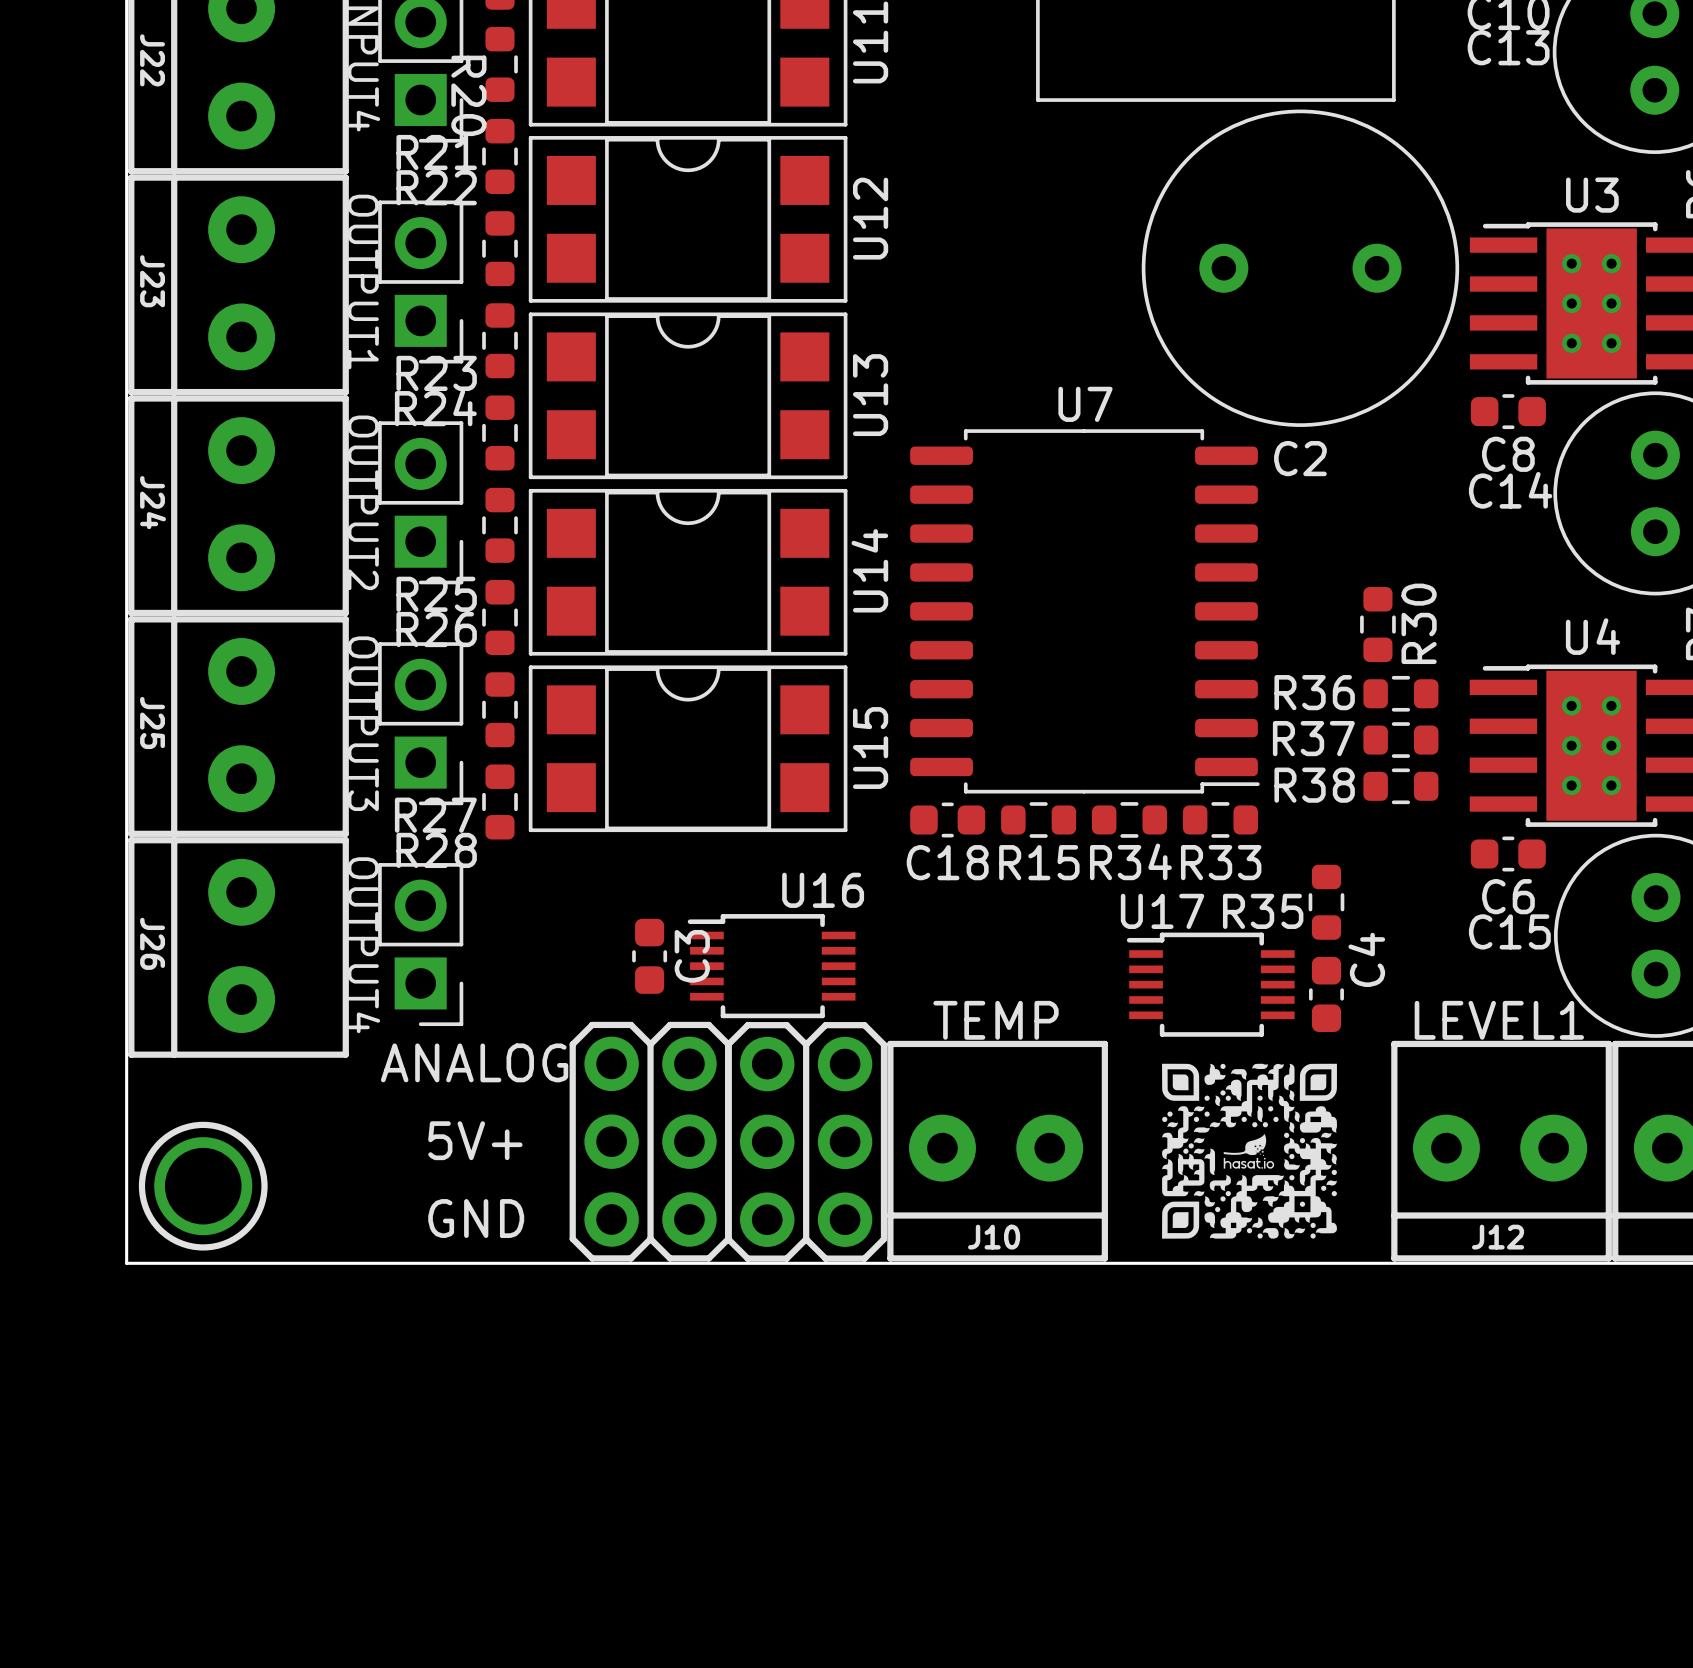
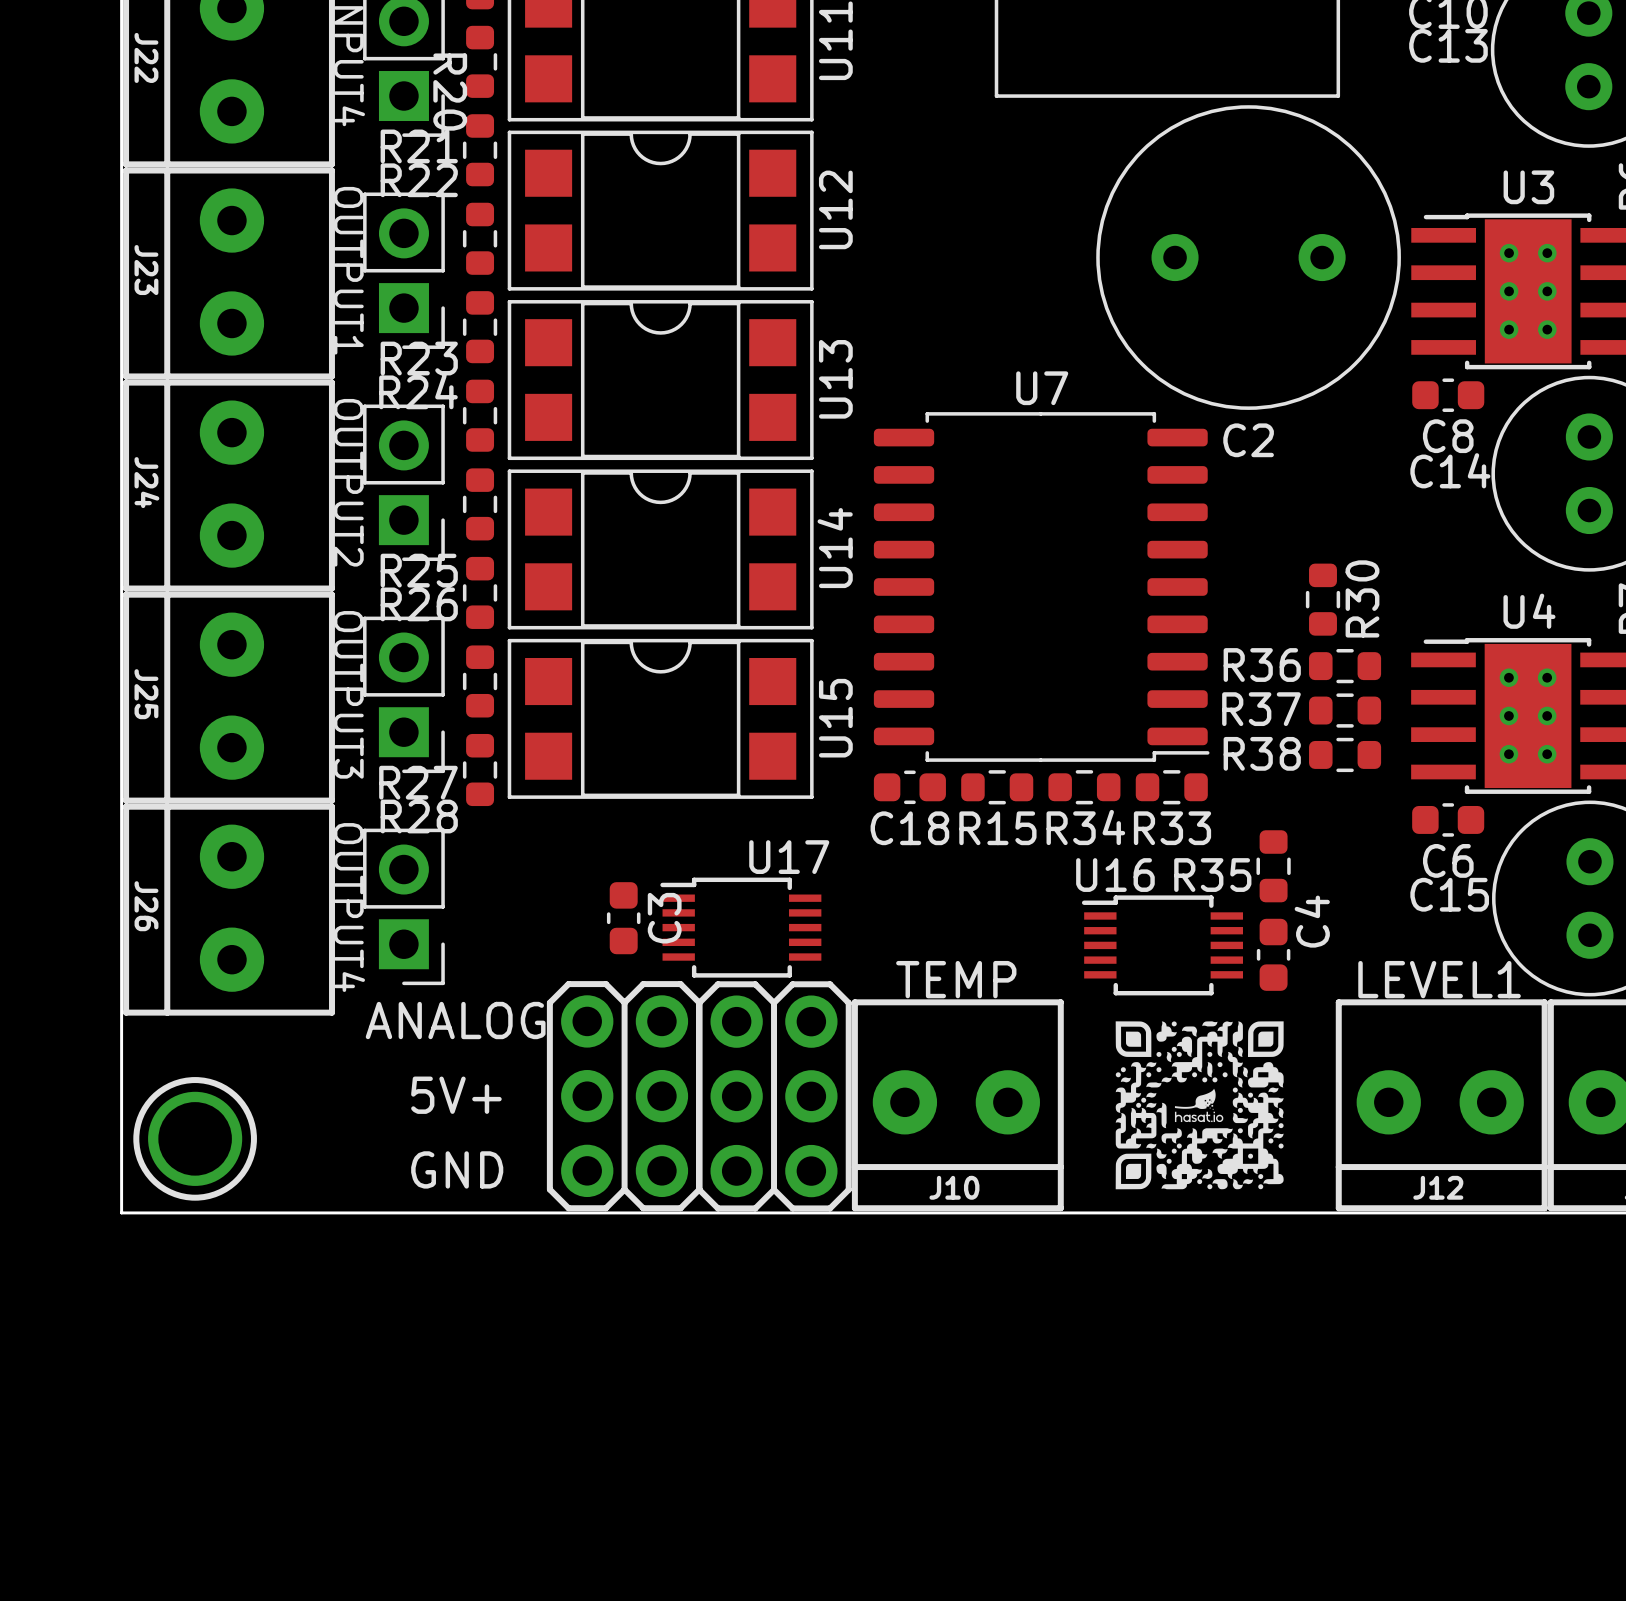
U16 name: U16 (823, 890) -> U17 (789, 857)
U17 name: U17 (1162, 911) -> U16 (1115, 875)

